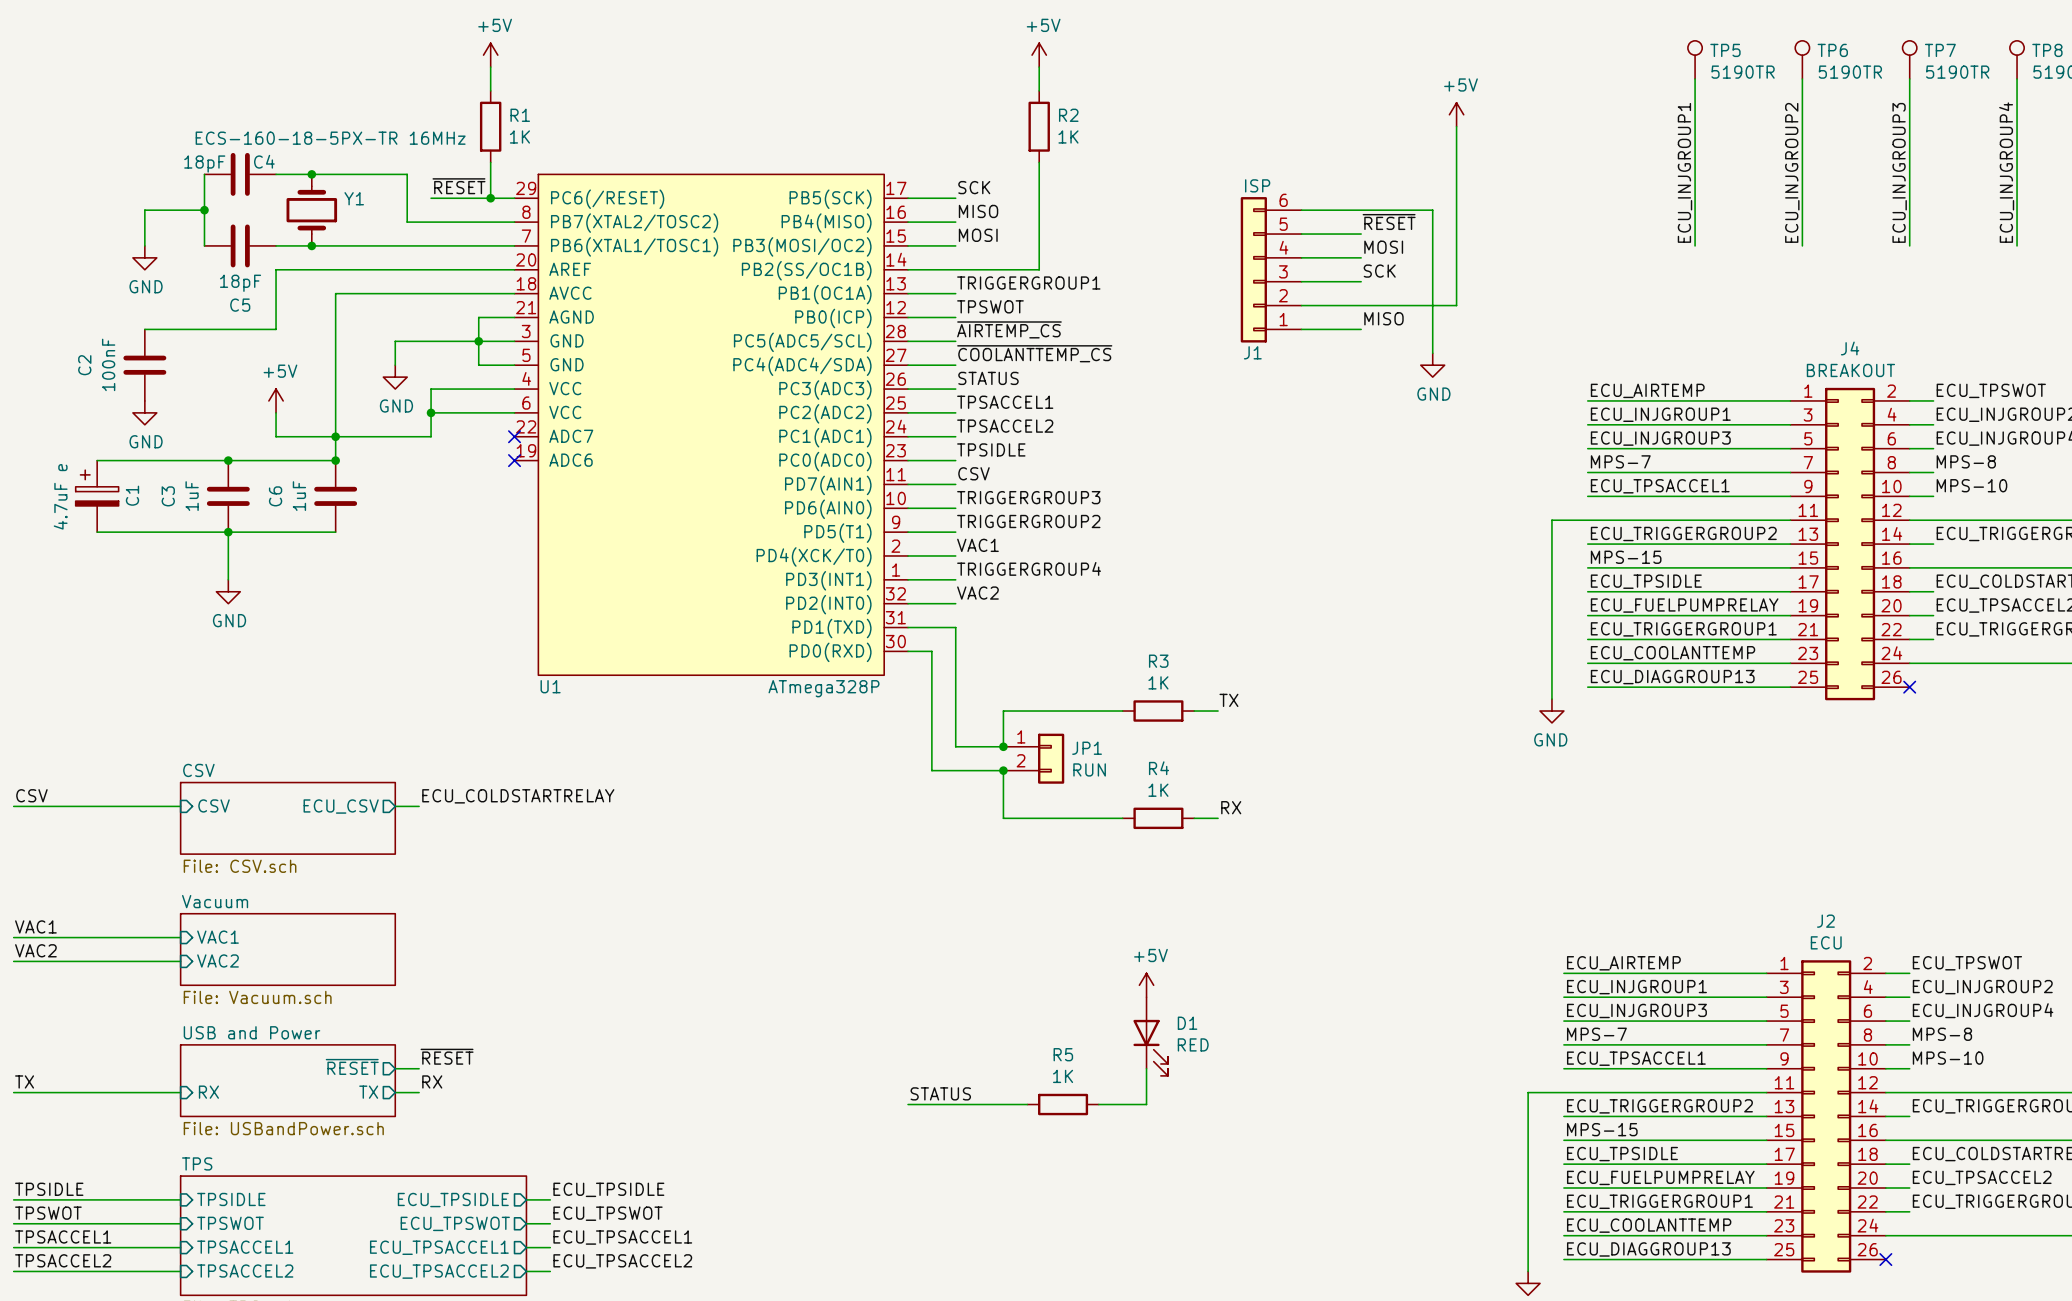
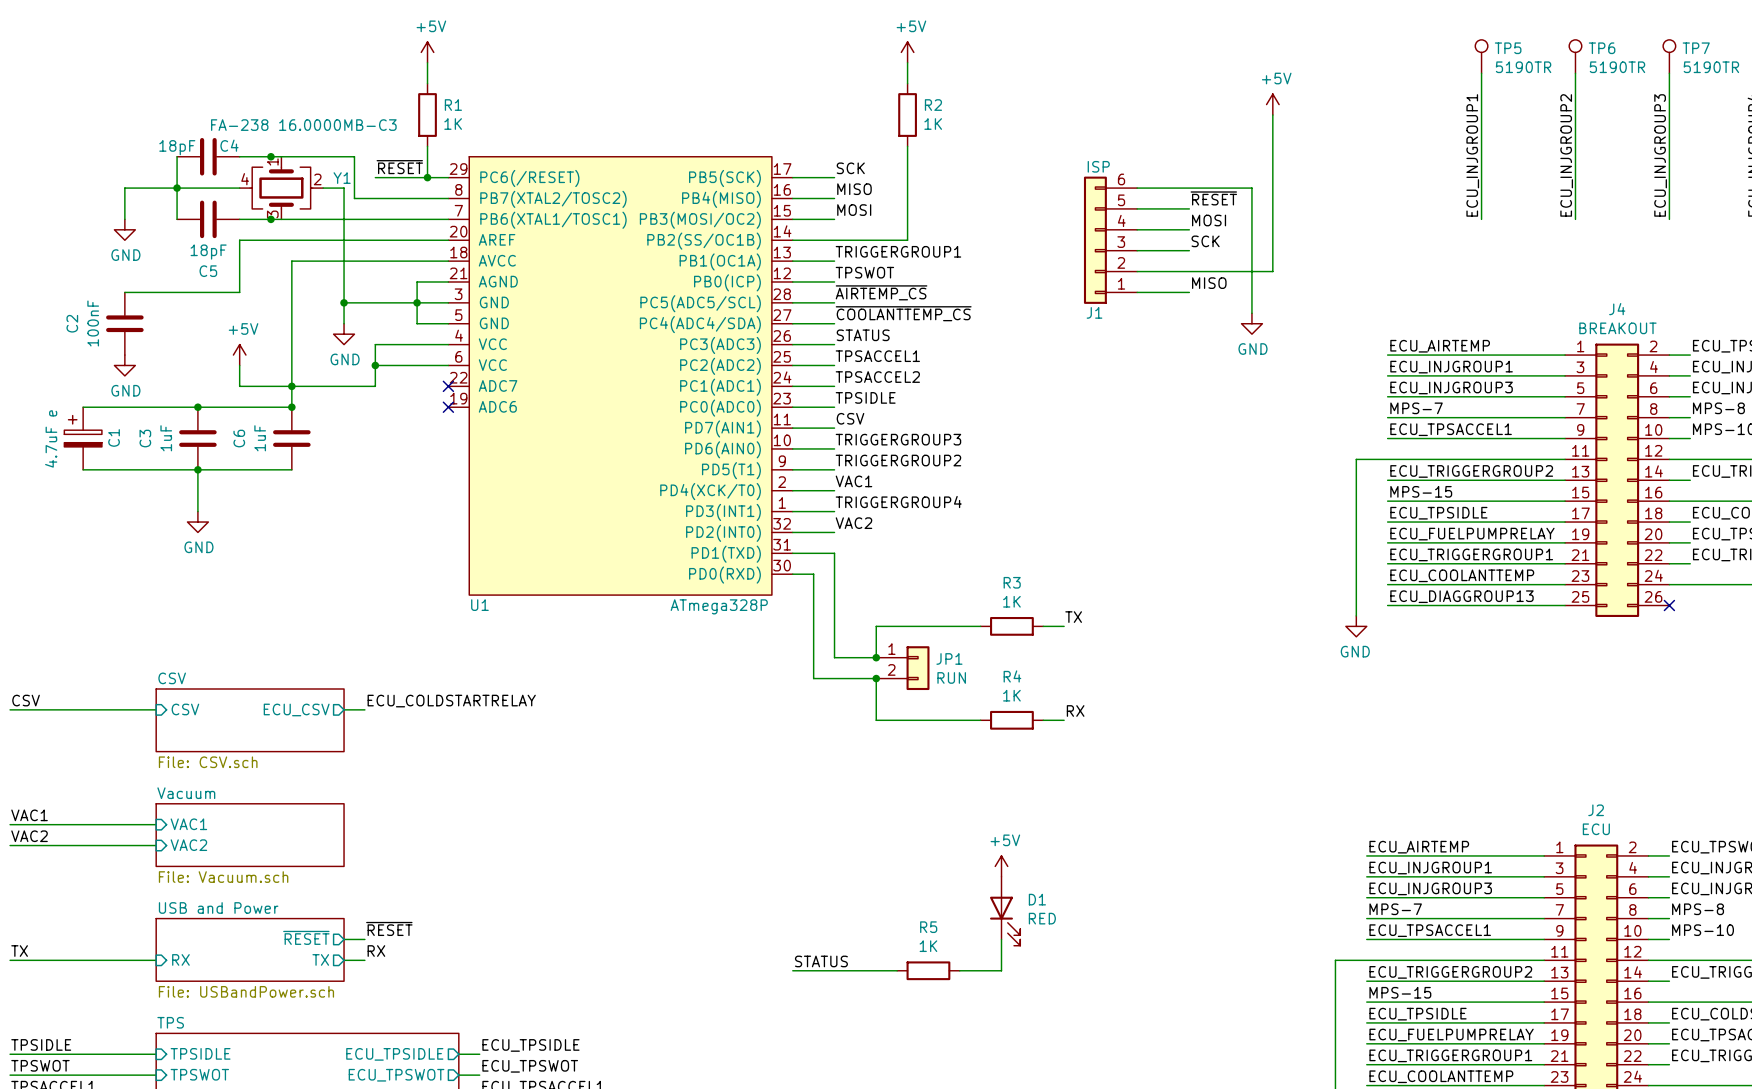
Y1 value: ECS-160-18-5PX-TR 16MHz (330, 138) -> FA-238 16.0000MB-C3 (303, 125)
Y1 symbol: [286, 174, 338, 246] -> [239, 156, 324, 220]
Y1 name position: Y1 (354, 198) -> Y1 (342, 178)
wire: none -> (177, 188) (239, 188)
wire: none -> (323, 188) (344, 188) (344, 302)
junction: none -> (344, 302)

